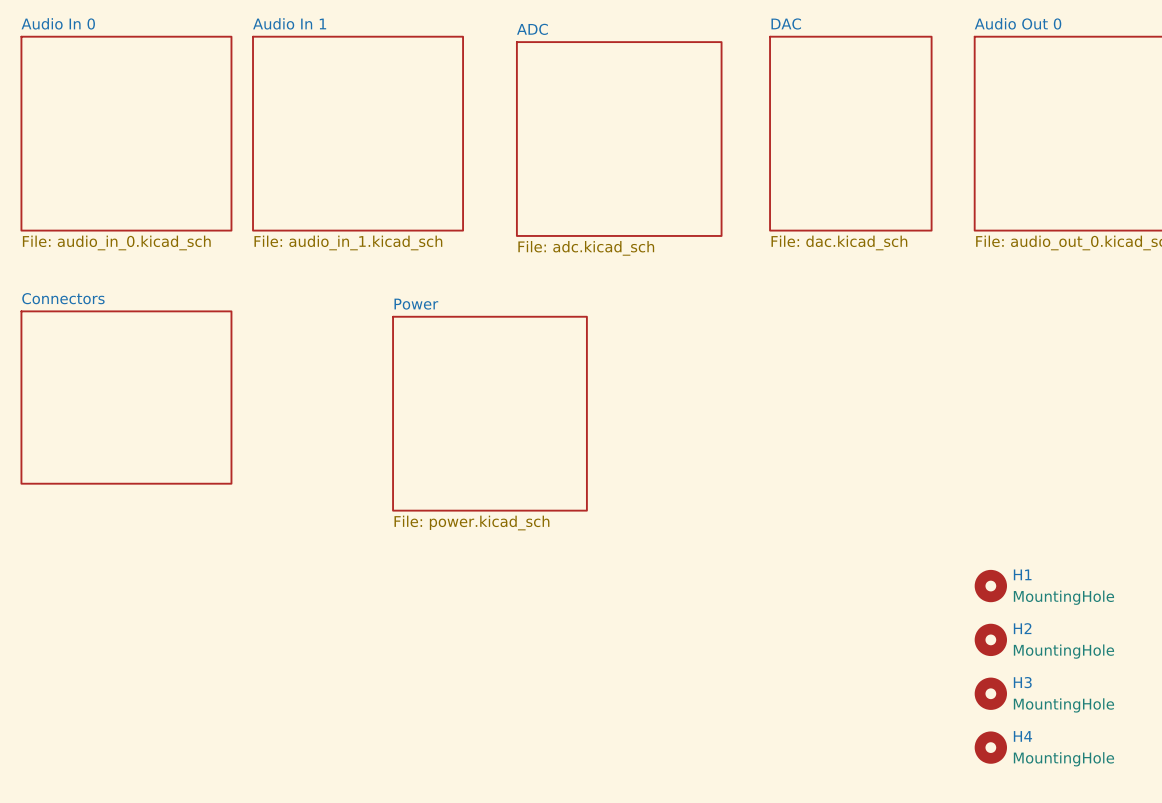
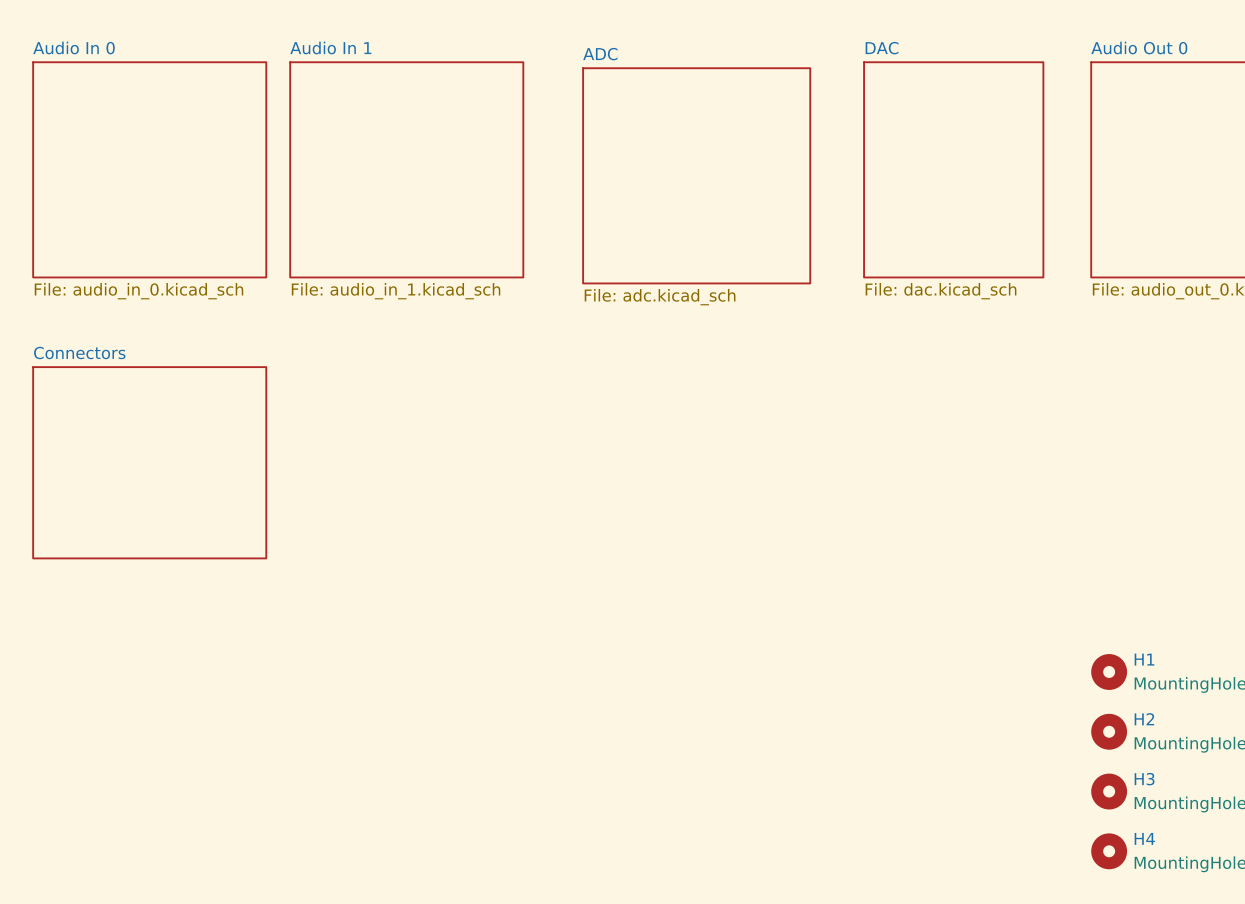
sheet Power: File: power.kicad_sch (489, 413) -> none

